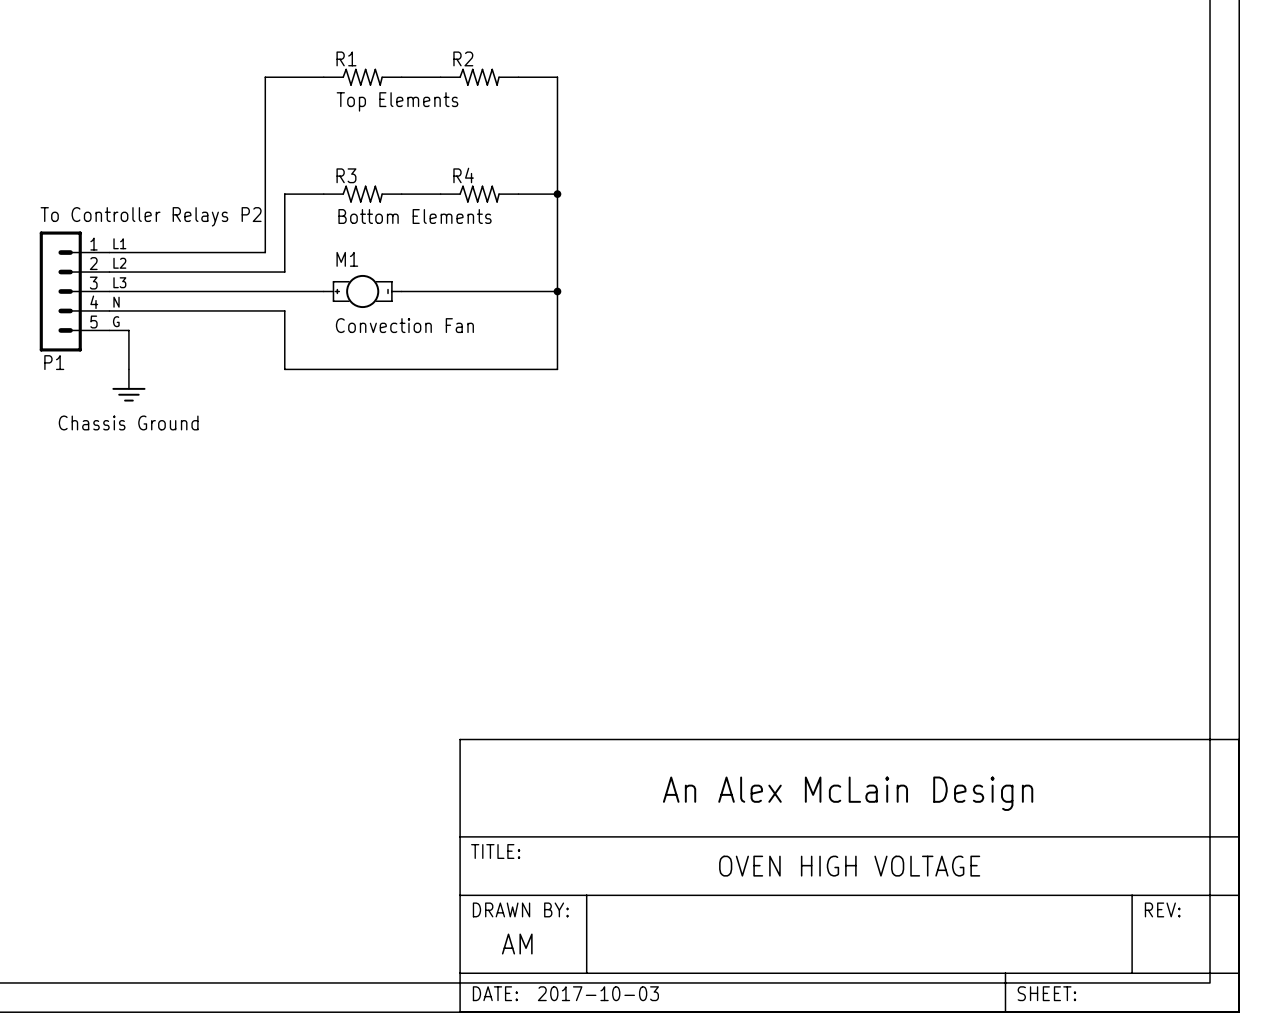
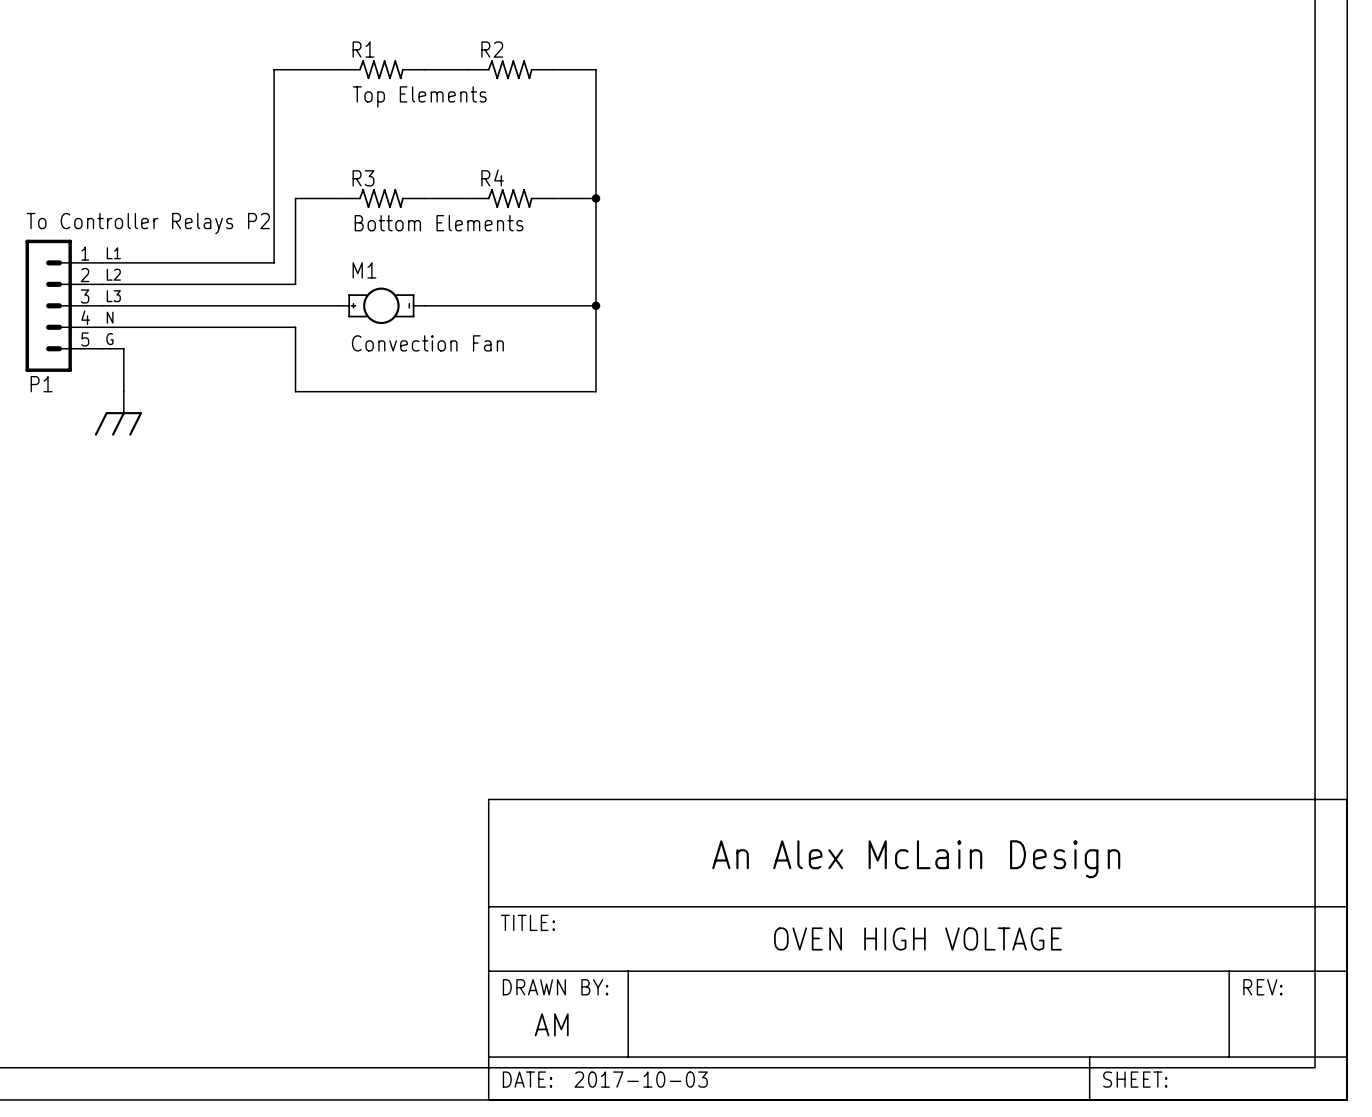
power symbol shape: [112, 369, 146, 402] -> [94, 391, 143, 436]
power symbol text: Chassis Ground (128, 422) -> none

